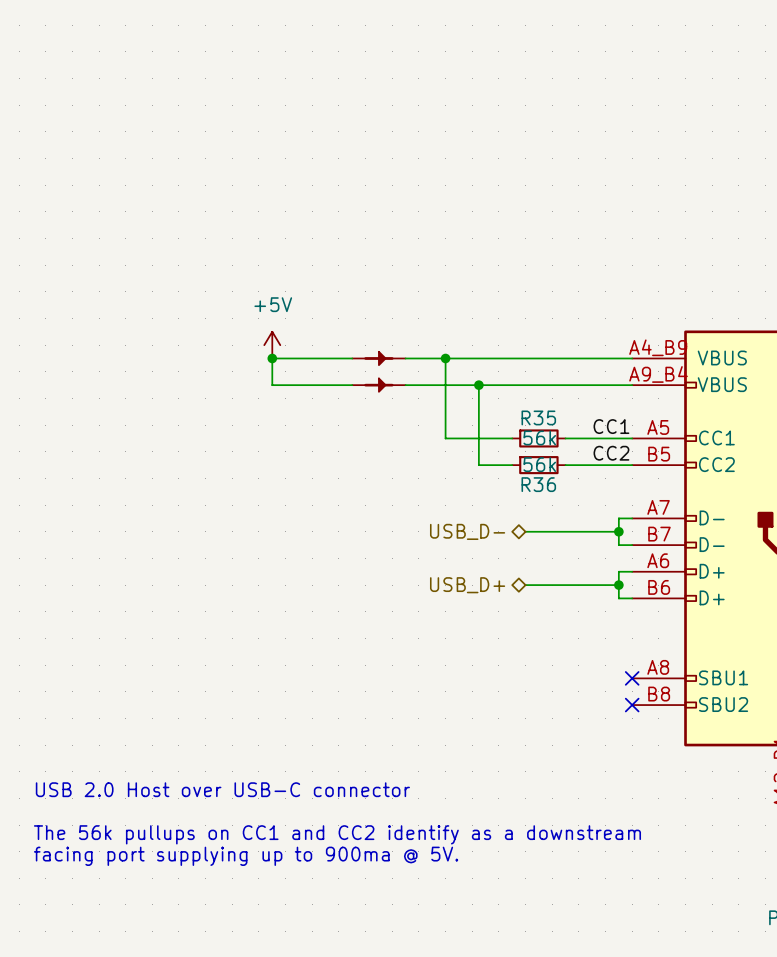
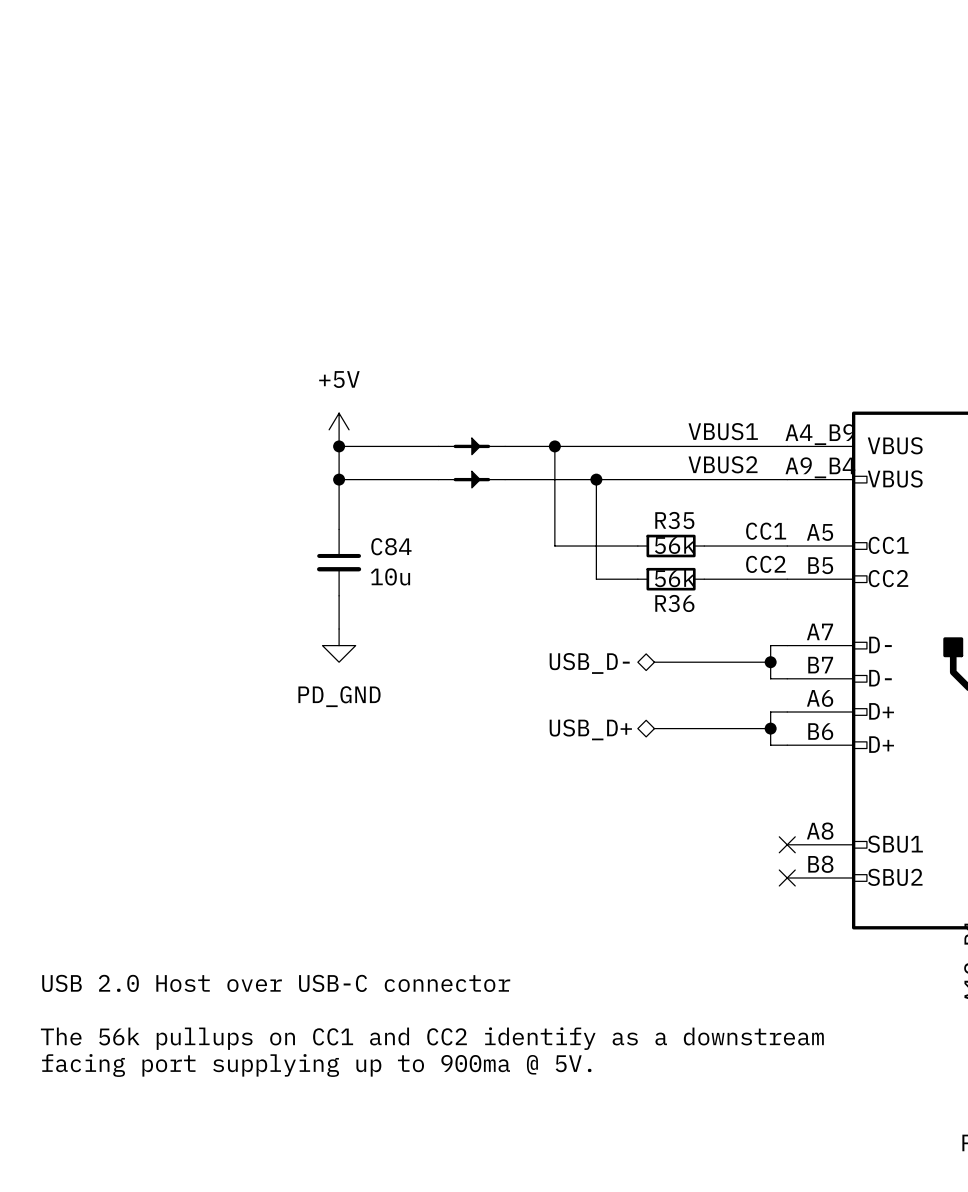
label: none -> VBUS1 (723, 431)
label: none -> VBUS2 (723, 464)
wire: none -> (339, 479) (339, 529)
junction: none -> (339, 479)
C84: none -> 10u (339, 562)
wire: none -> (339, 595) (339, 629)
power symbol: none -> PD_GND (339, 645)

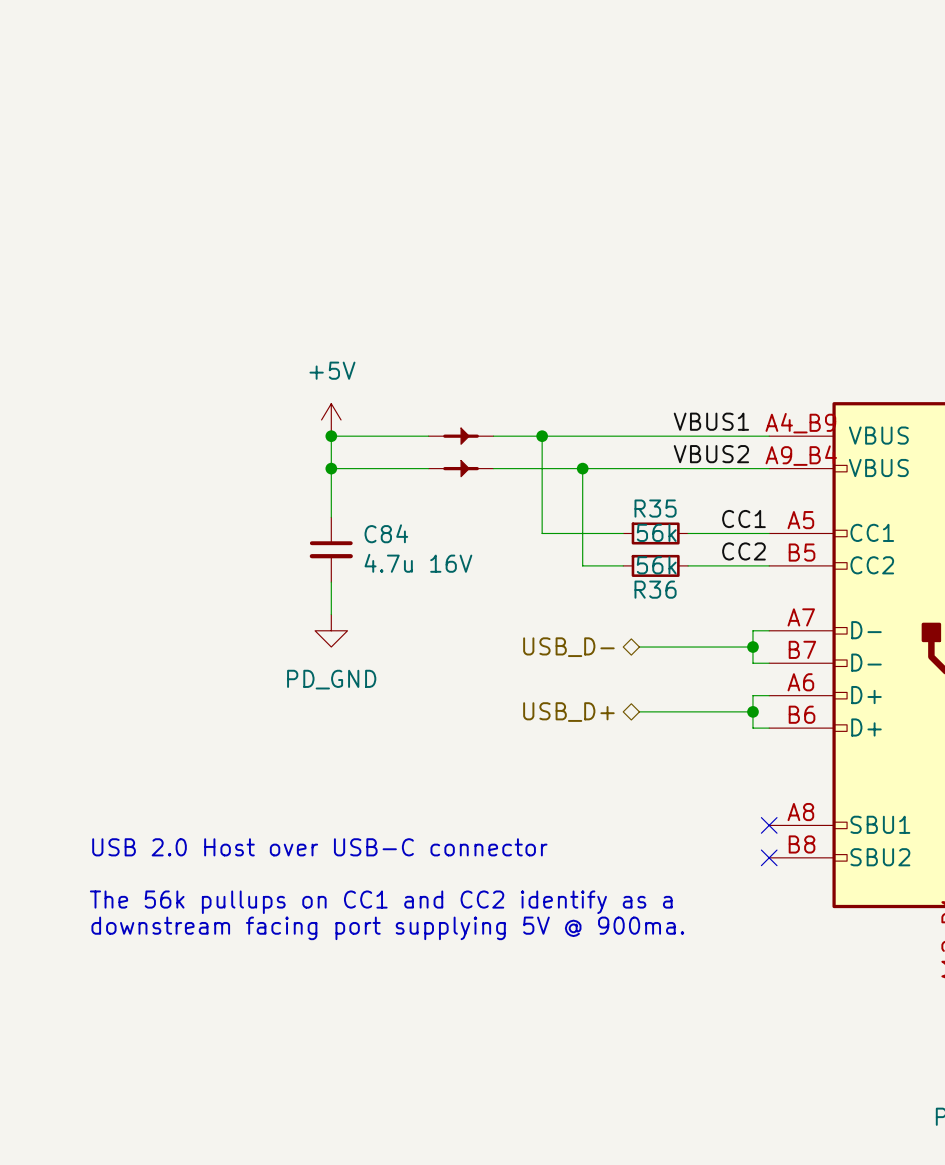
C84 value: 10u (390, 576) -> 4.7u 16V (418, 563)
text: none -> The 56k pullups on CC1 and CC2 identify as a (381, 902)
text: none -> downstream facing port supplying 5V @ 900ma. (387, 928)
text position: USB 2.0 Host over USB-C connector (276, 983) -> USB 2.0 Host over USB-C connector (319, 847)
text: The 56k pullups on CC1 and CC2 identify as a downstream (432, 1038) -> none
text: facing port supplying up to 900ma @ 5V. (316, 1065) -> none

